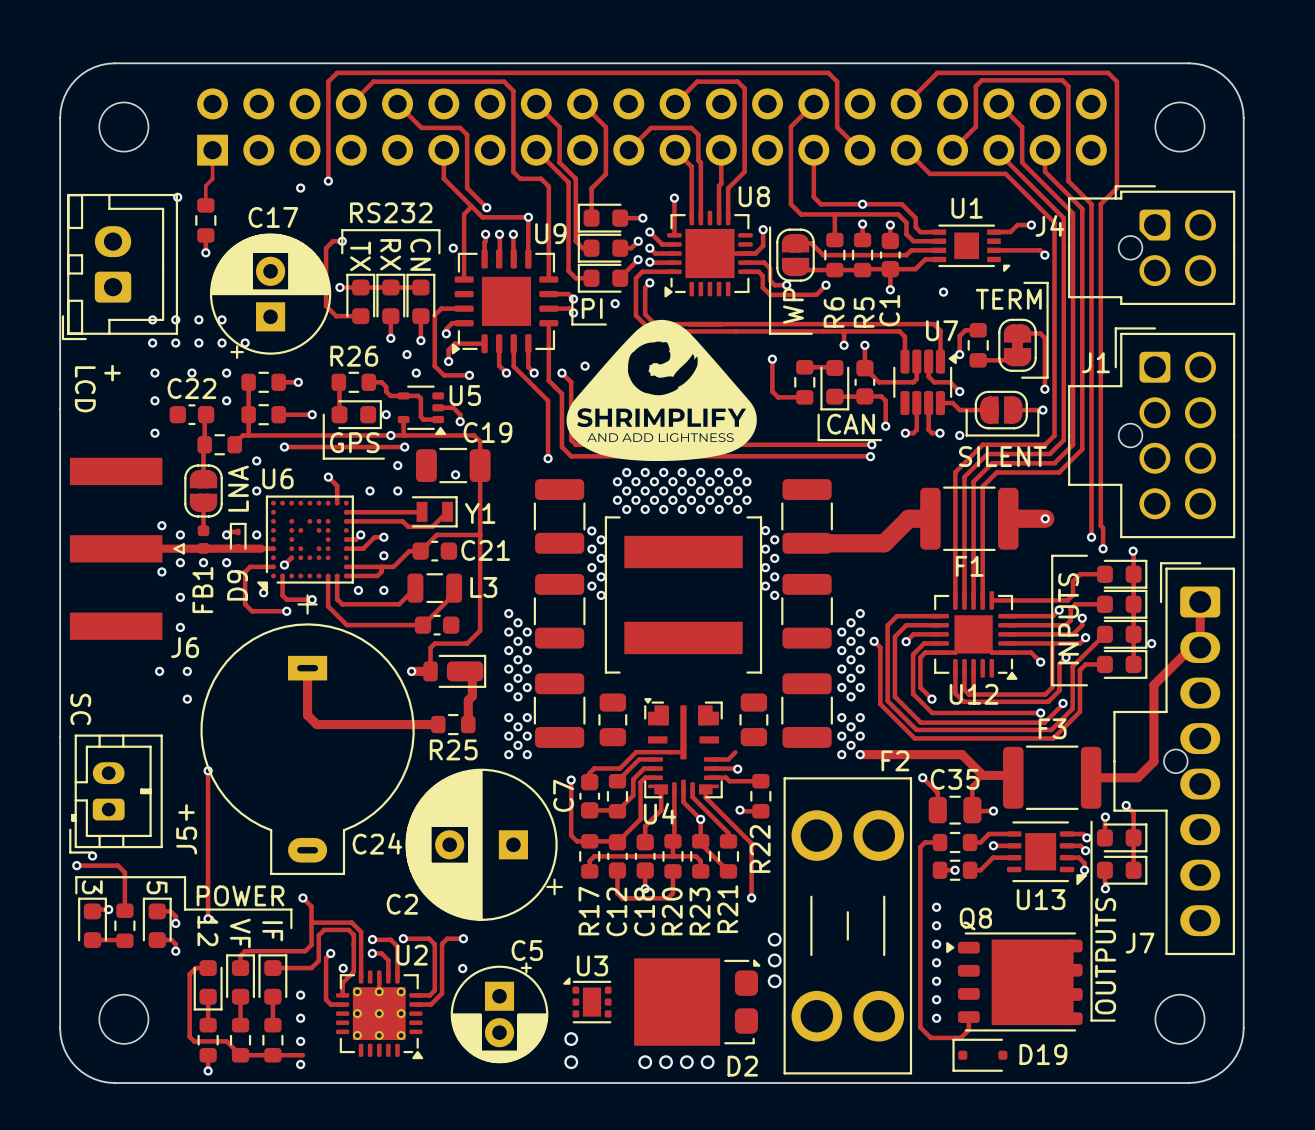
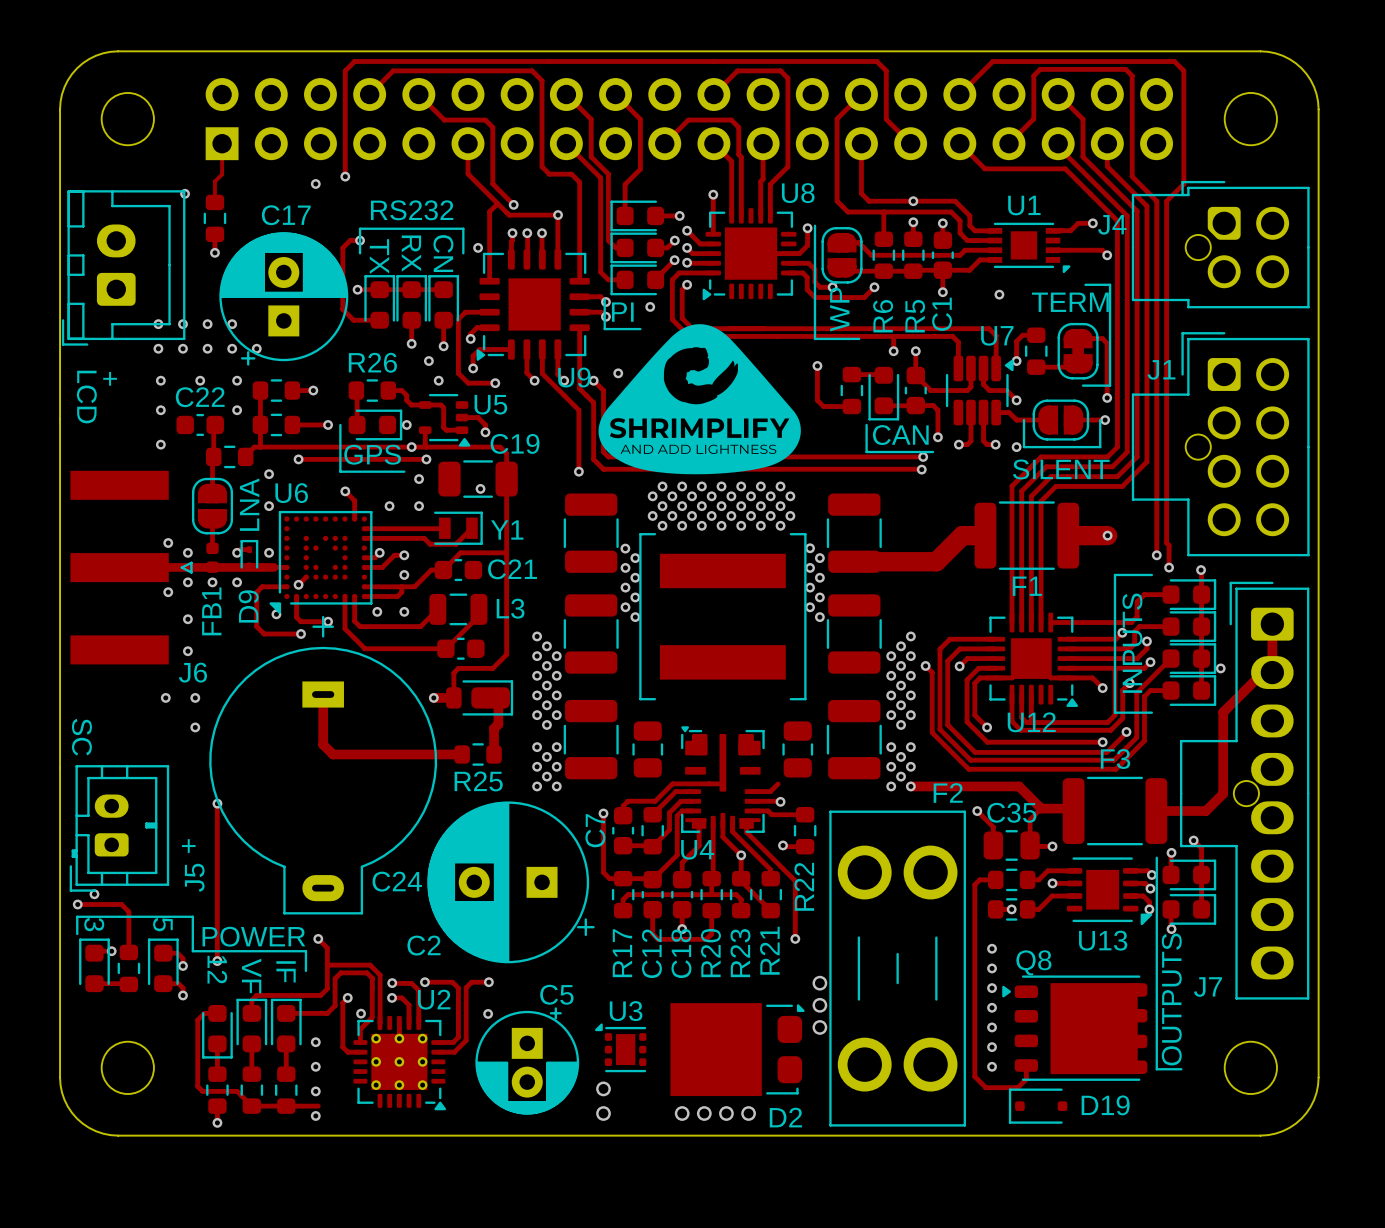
U9 name position: U9 (550, 233) -> U9 (574, 377)

